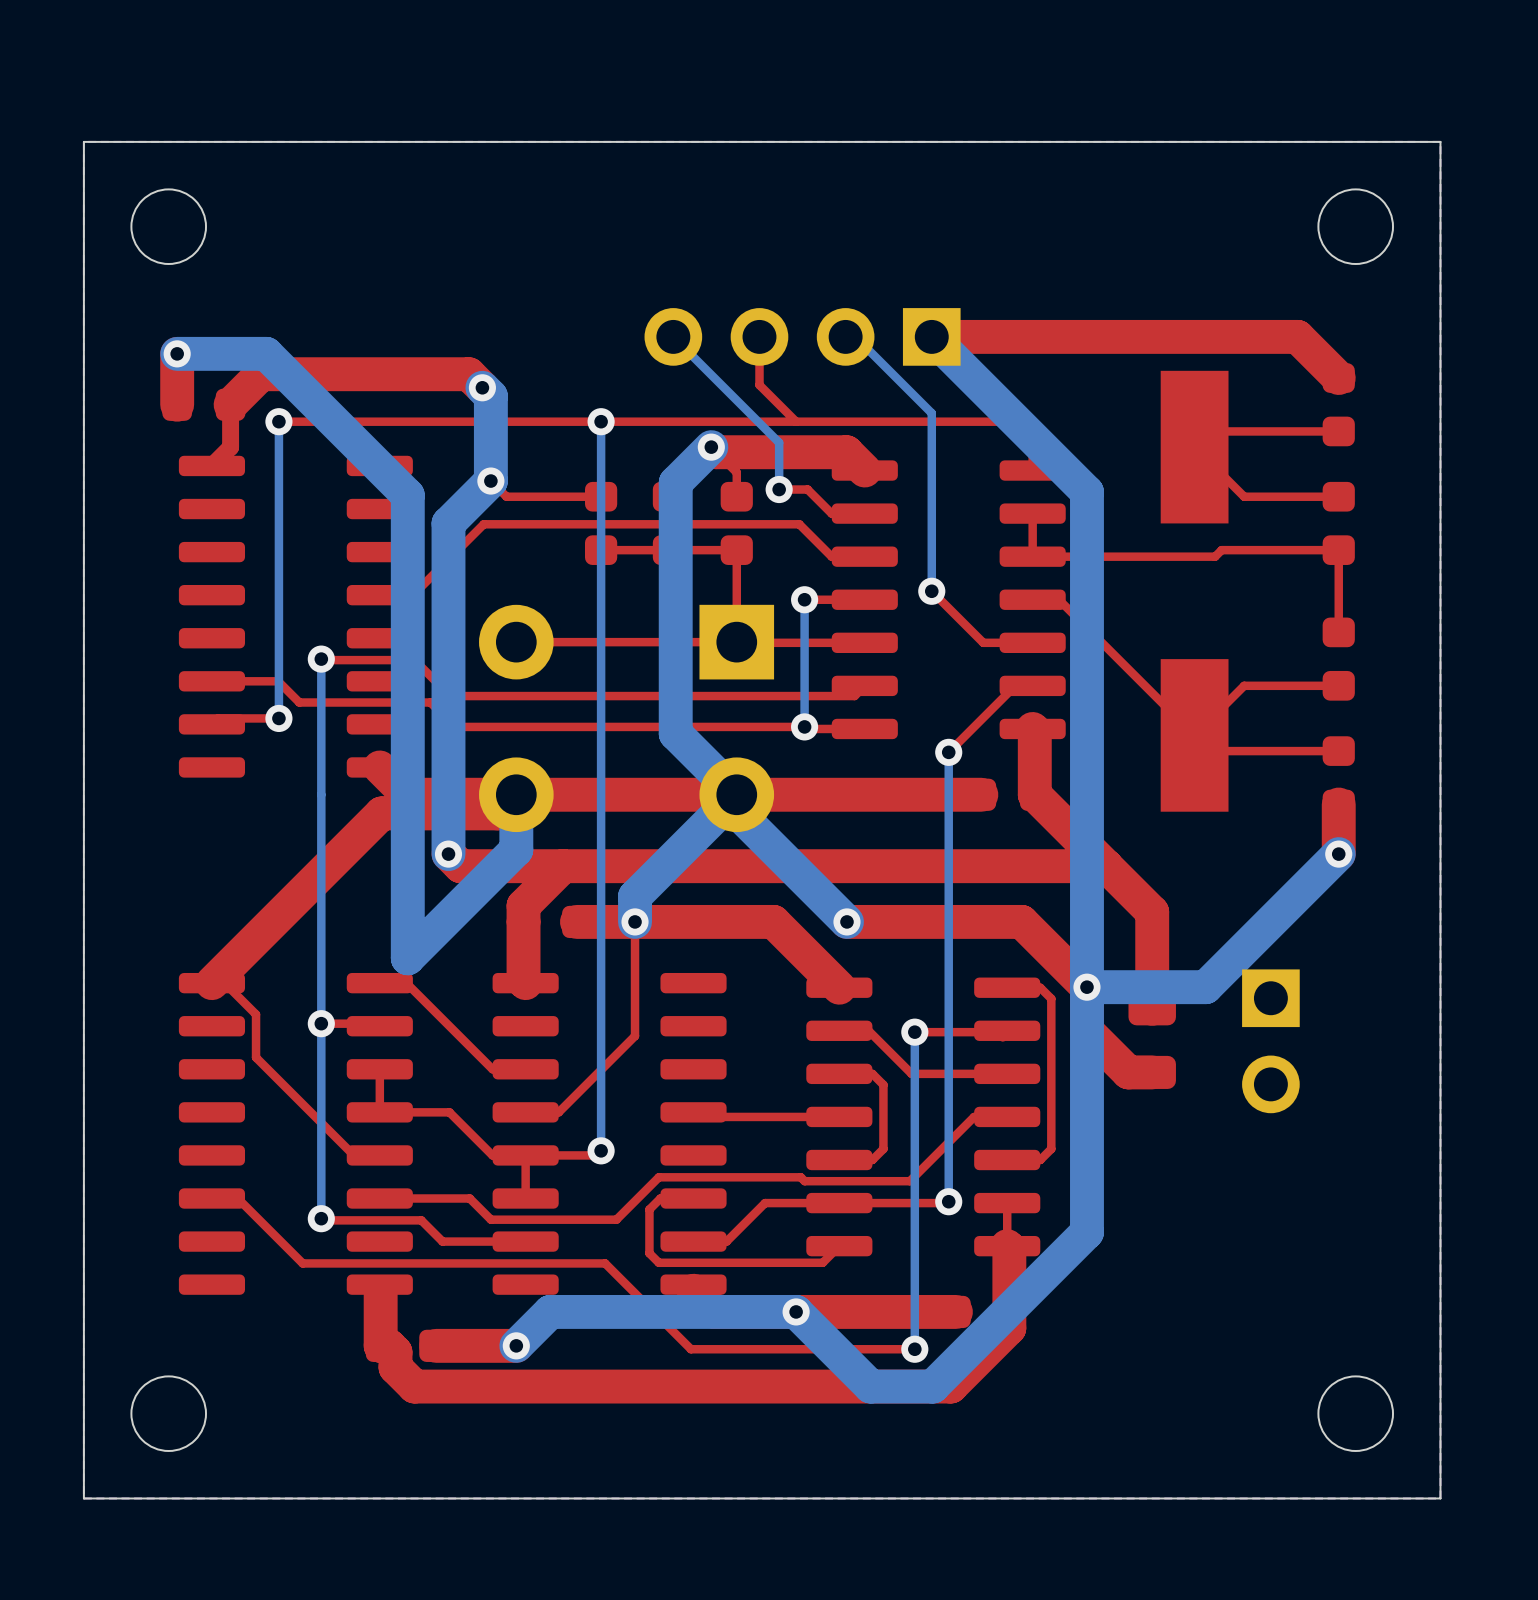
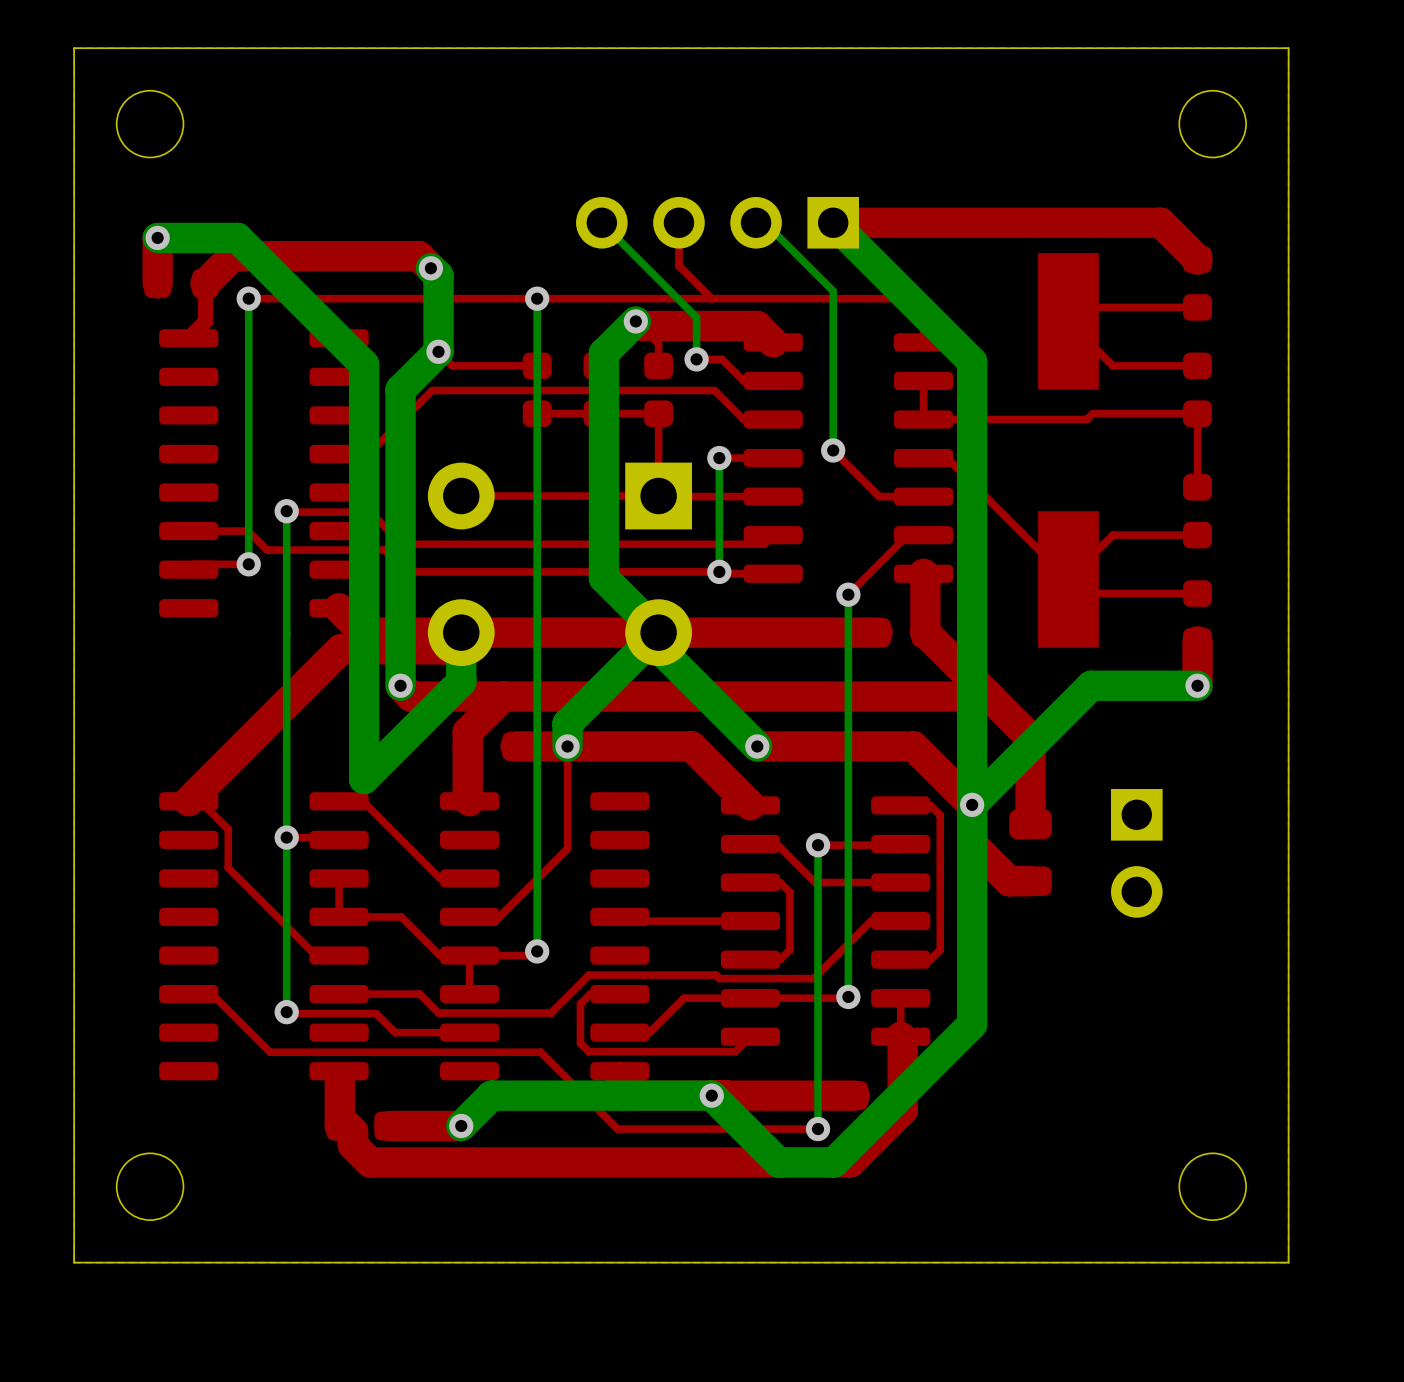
bottom track: (1338, 854) (1205, 987) (1086, 987) -> (1197, 685) (1091, 685) (972, 804)

